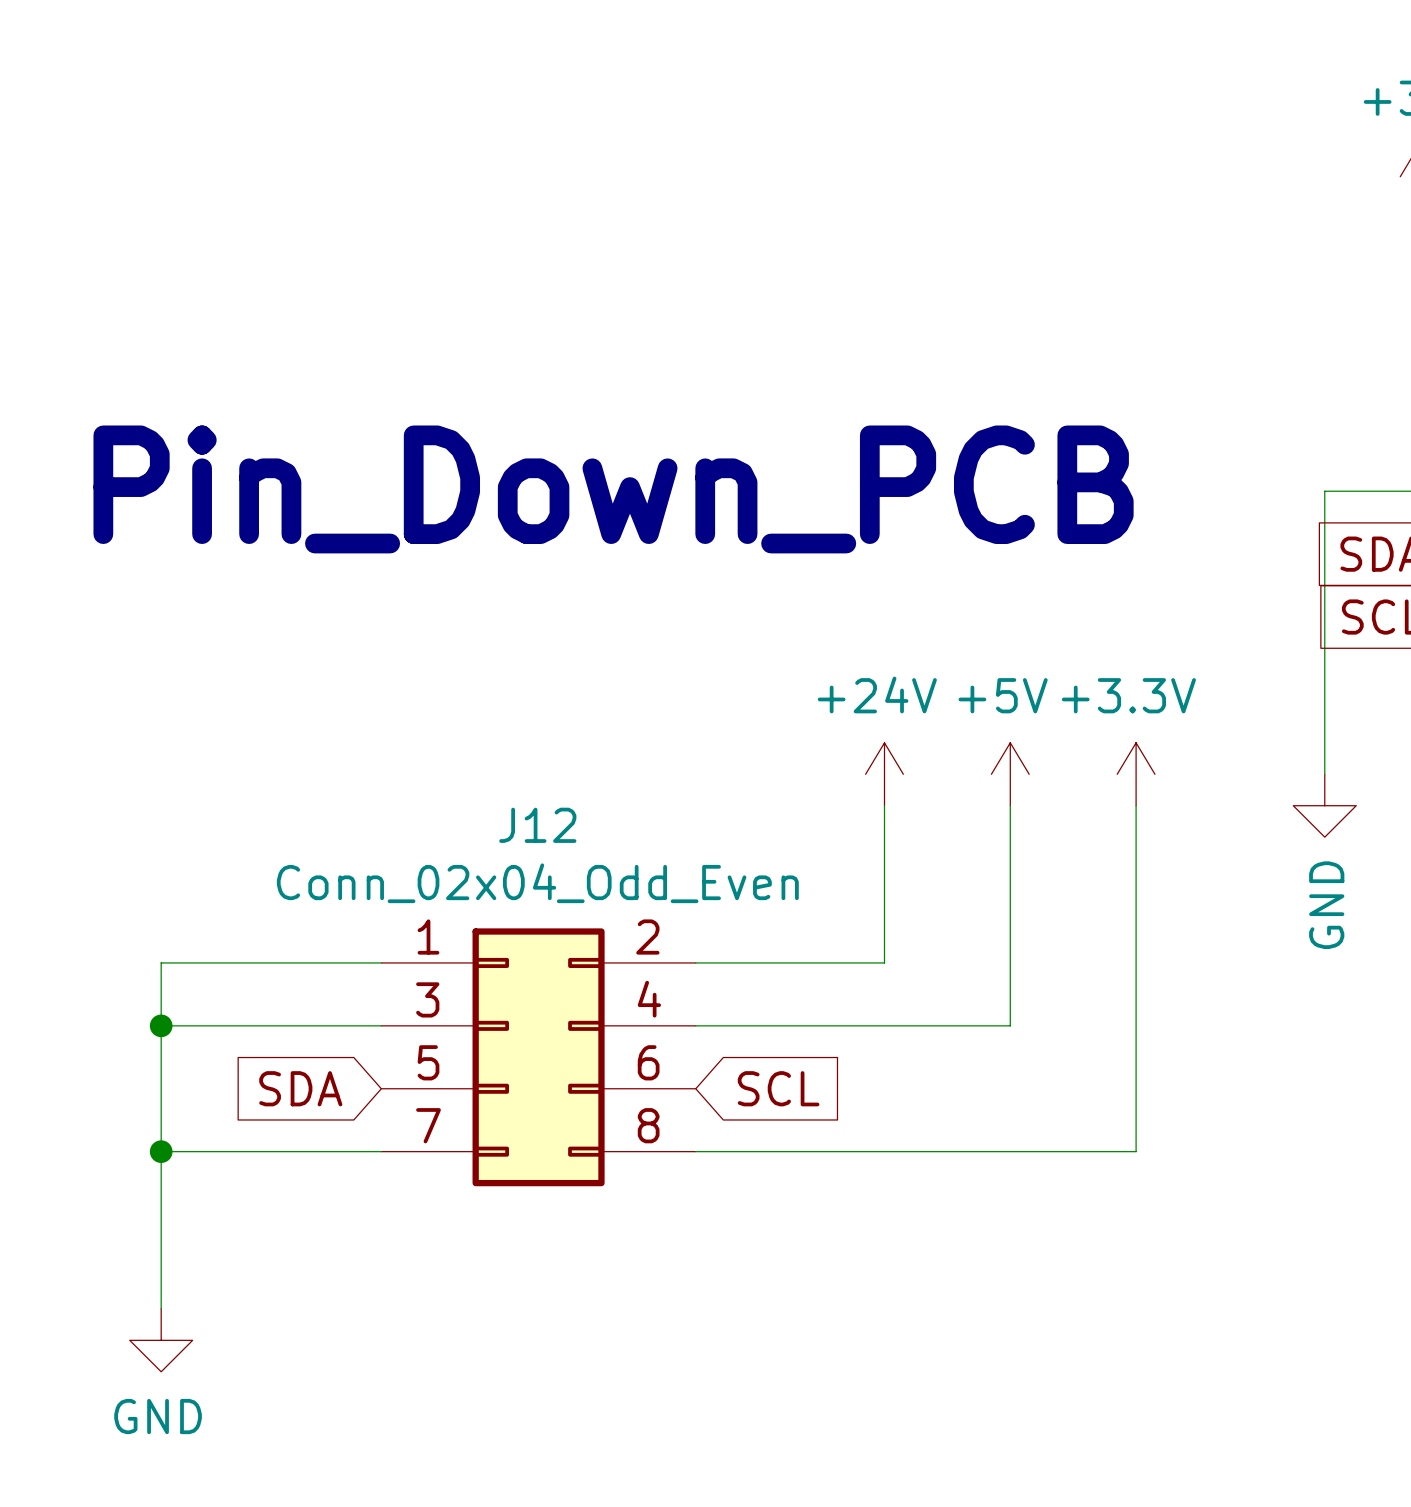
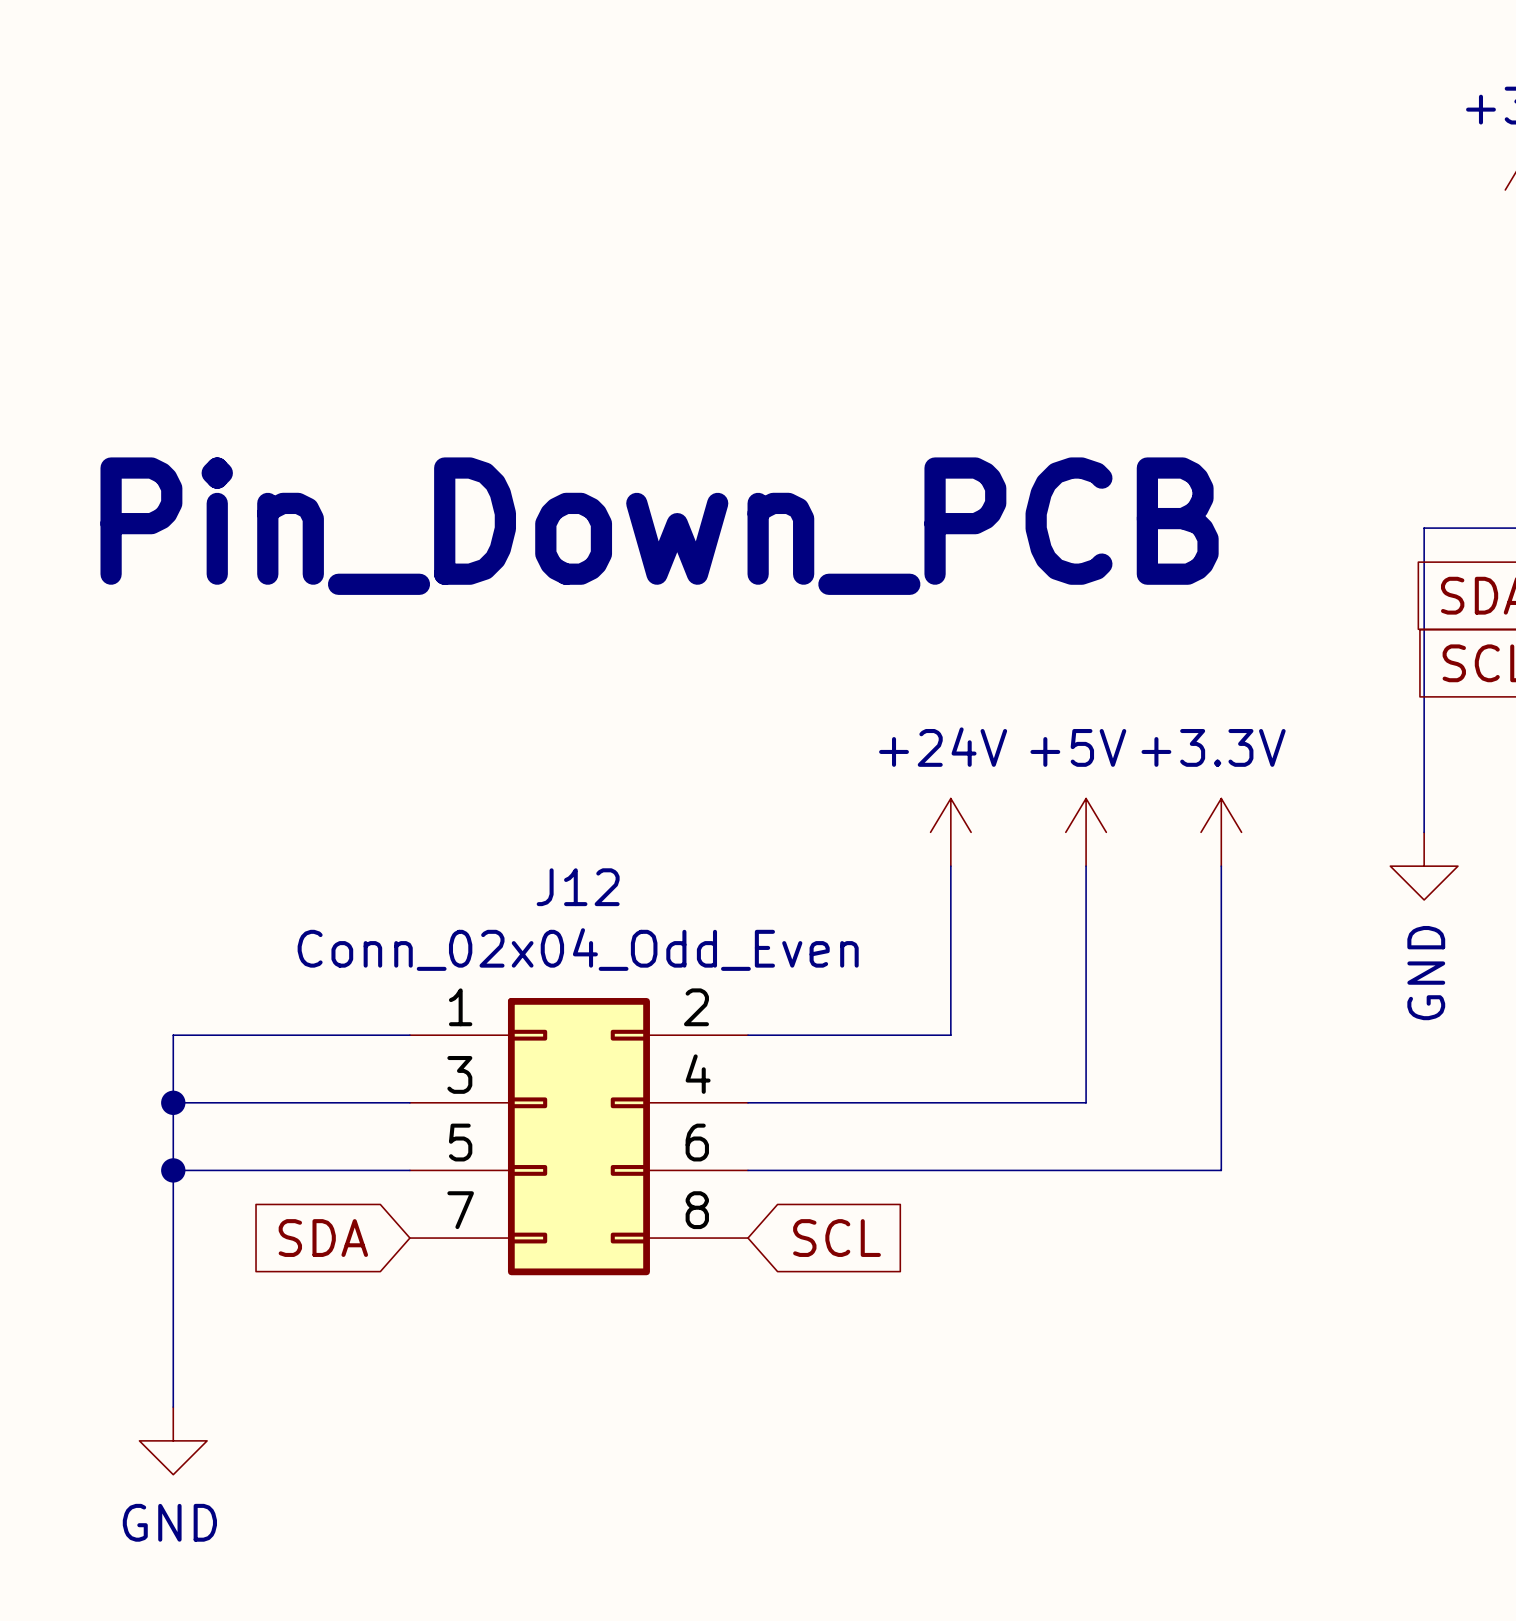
global label position: SDA (300, 1088) -> SDA (323, 1238)
global label position: SCL (778, 1088) -> SCL (837, 1238)
wire: (1136, 1088) (1136, 1151) (695, 1151) -> (1221, 1170) (748, 1170)
wire: (161, 1151) (381, 1151) -> (173, 1170) (409, 1170)
junction position: (161, 1151) -> (173, 1170)

